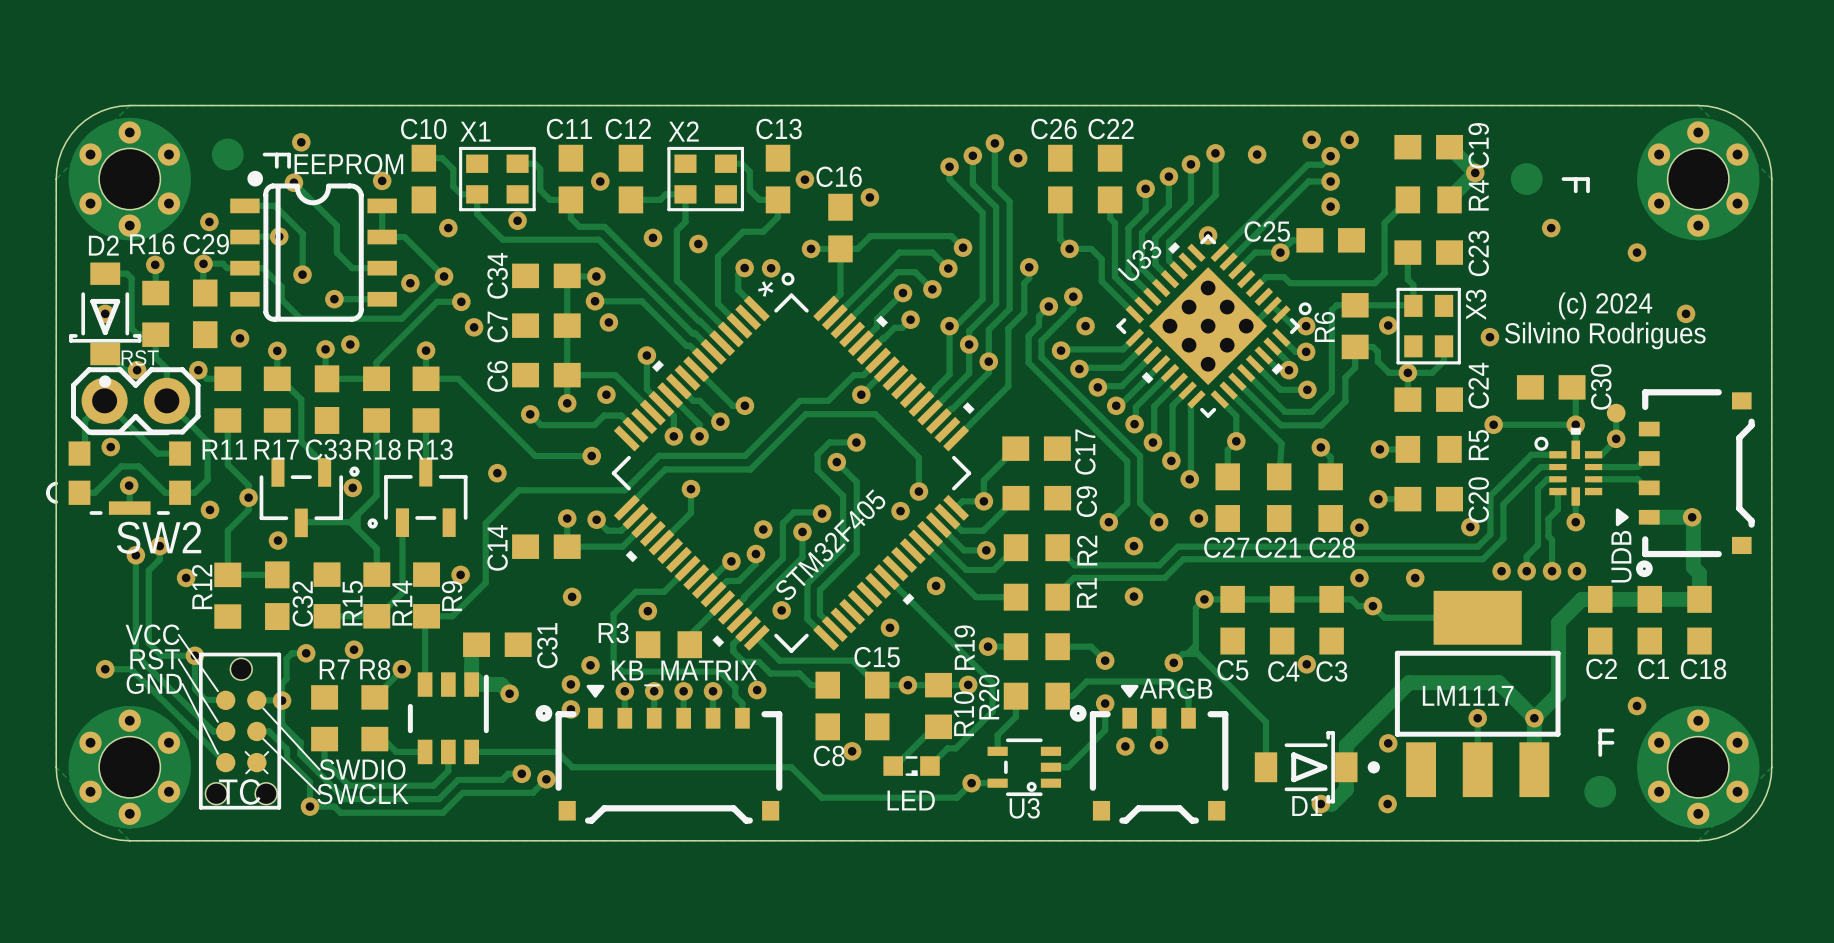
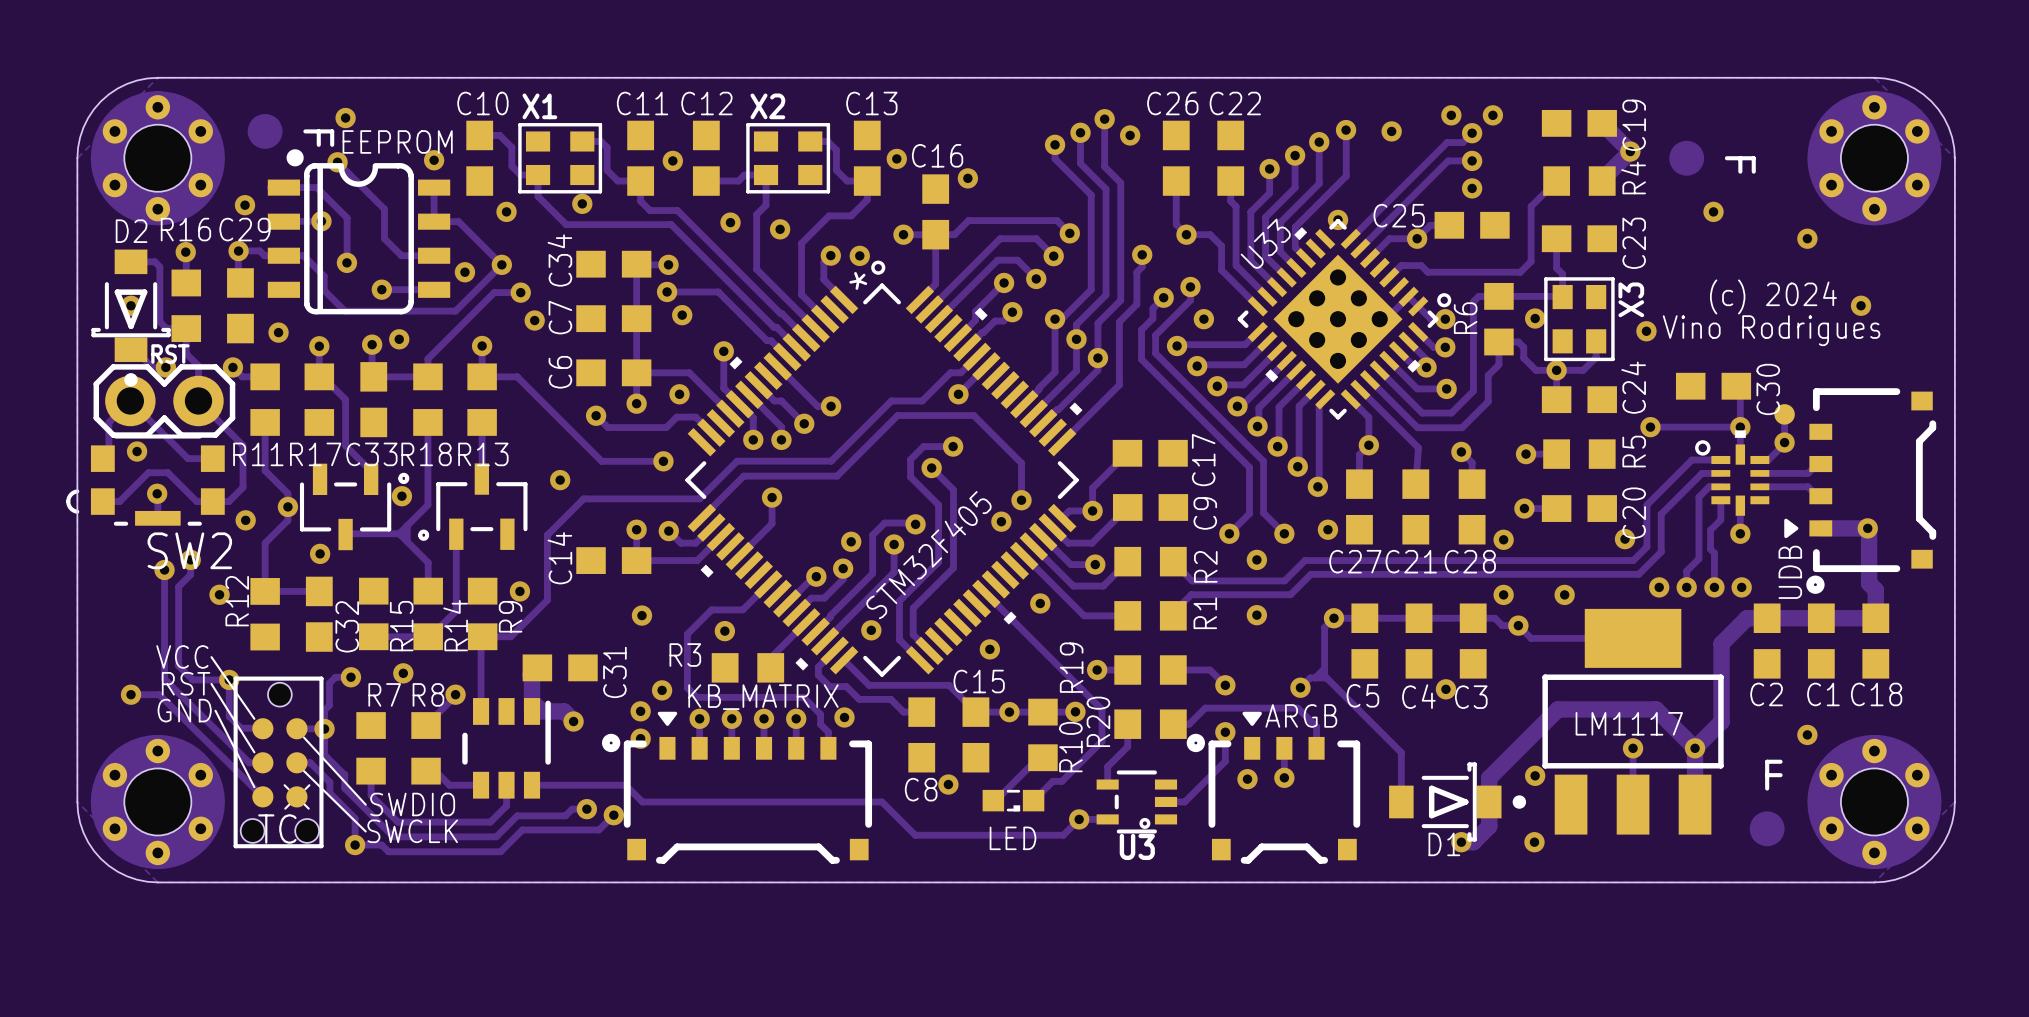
text: Silvino Rodrigues (1605, 335) -> Vino Rodrigues (1771, 330)

